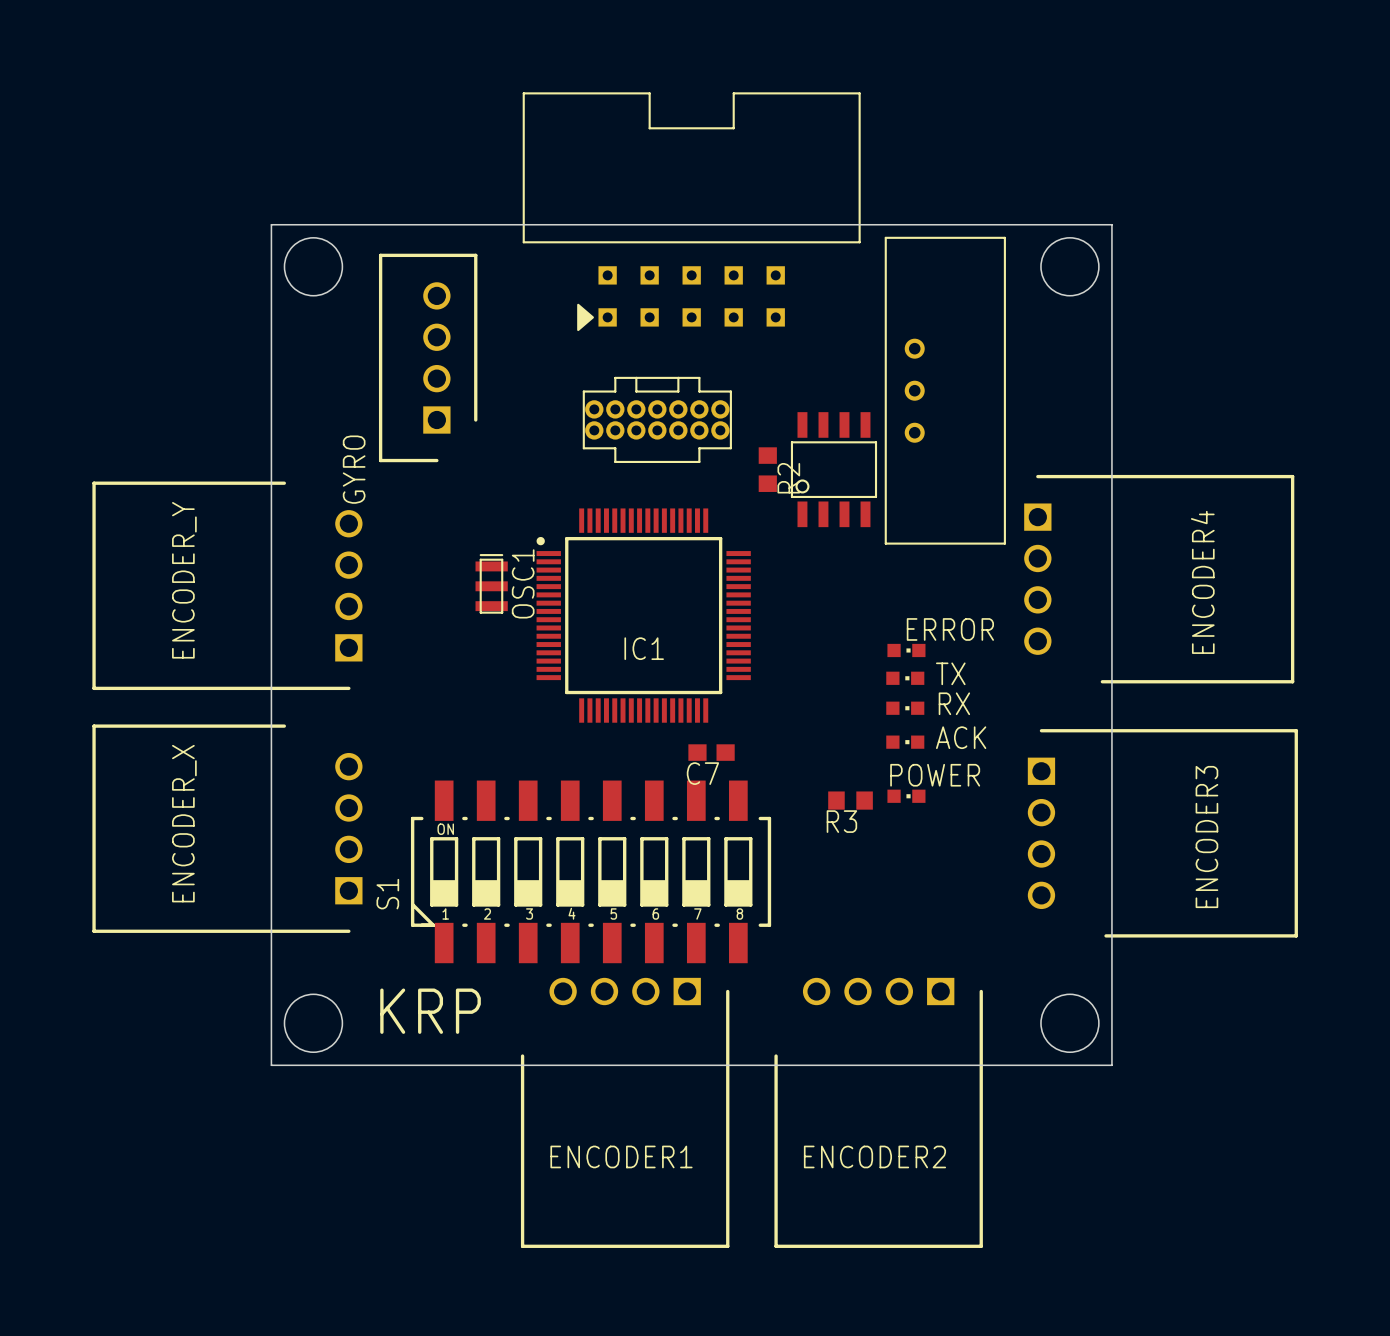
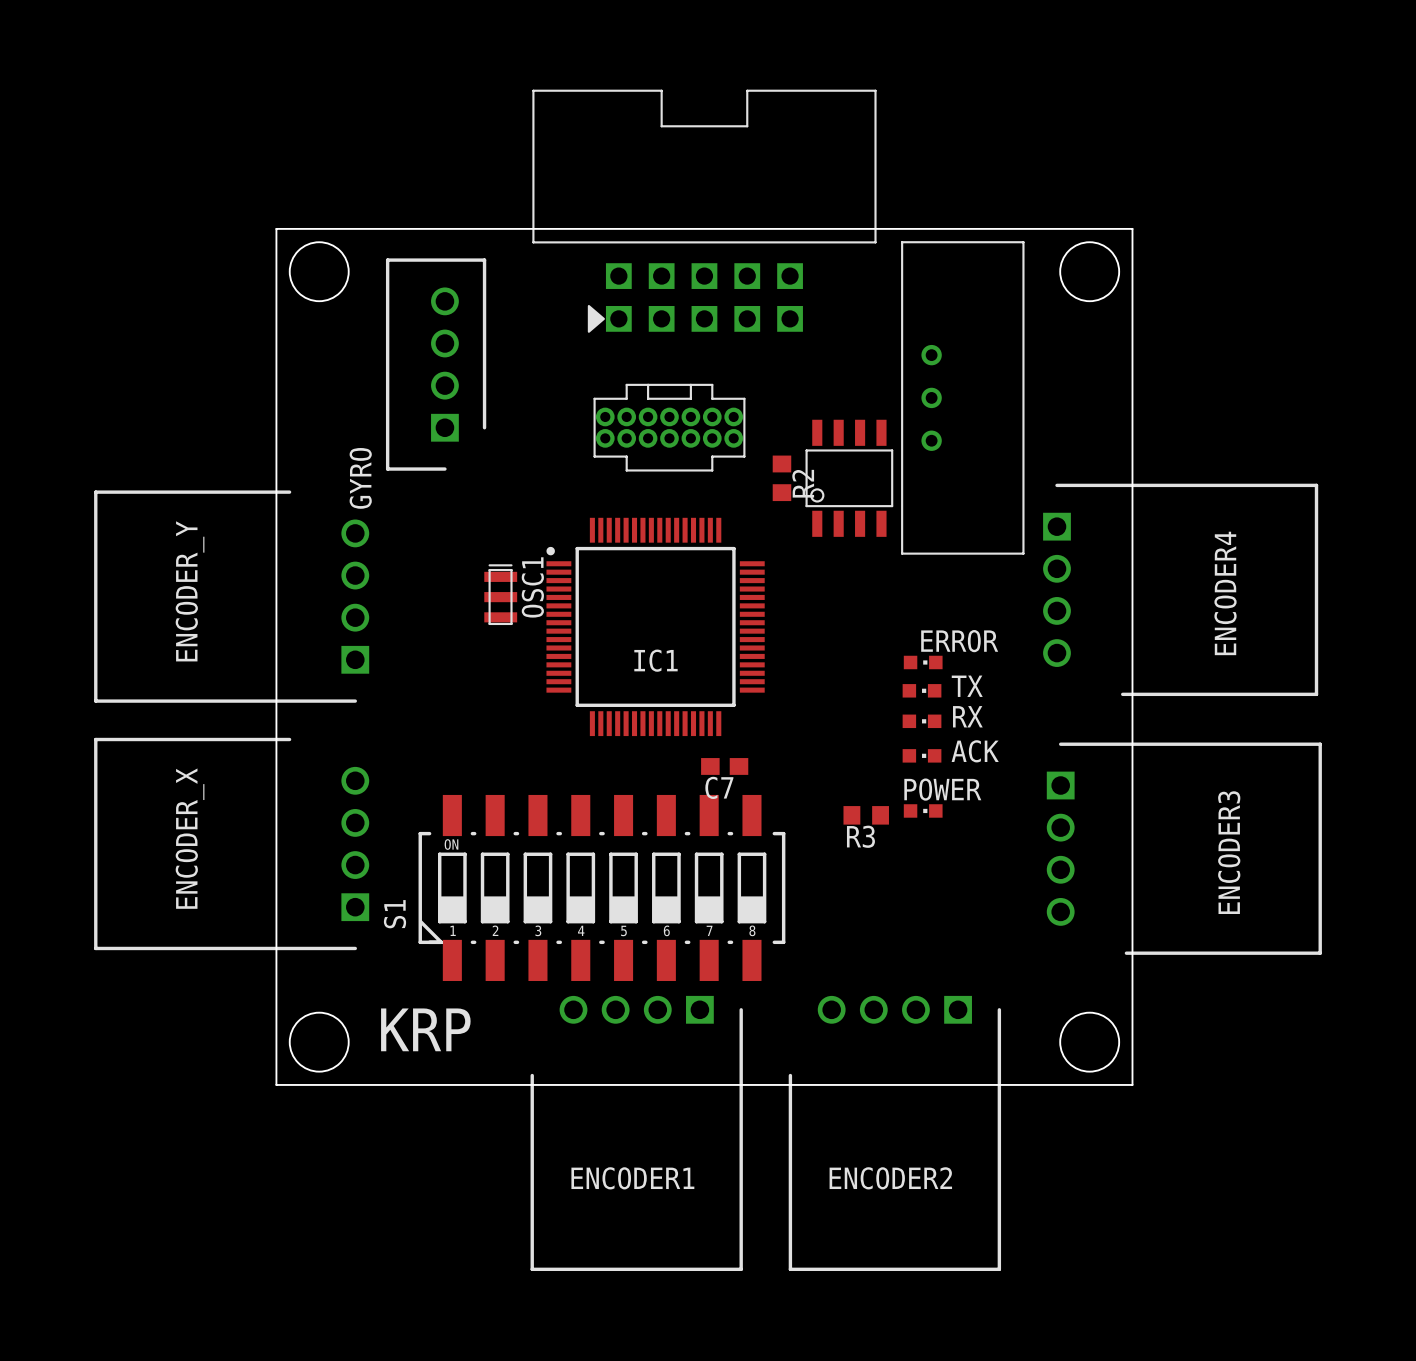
part footprint: [522, 92, 861, 332] -> [532, 89, 877, 333]

